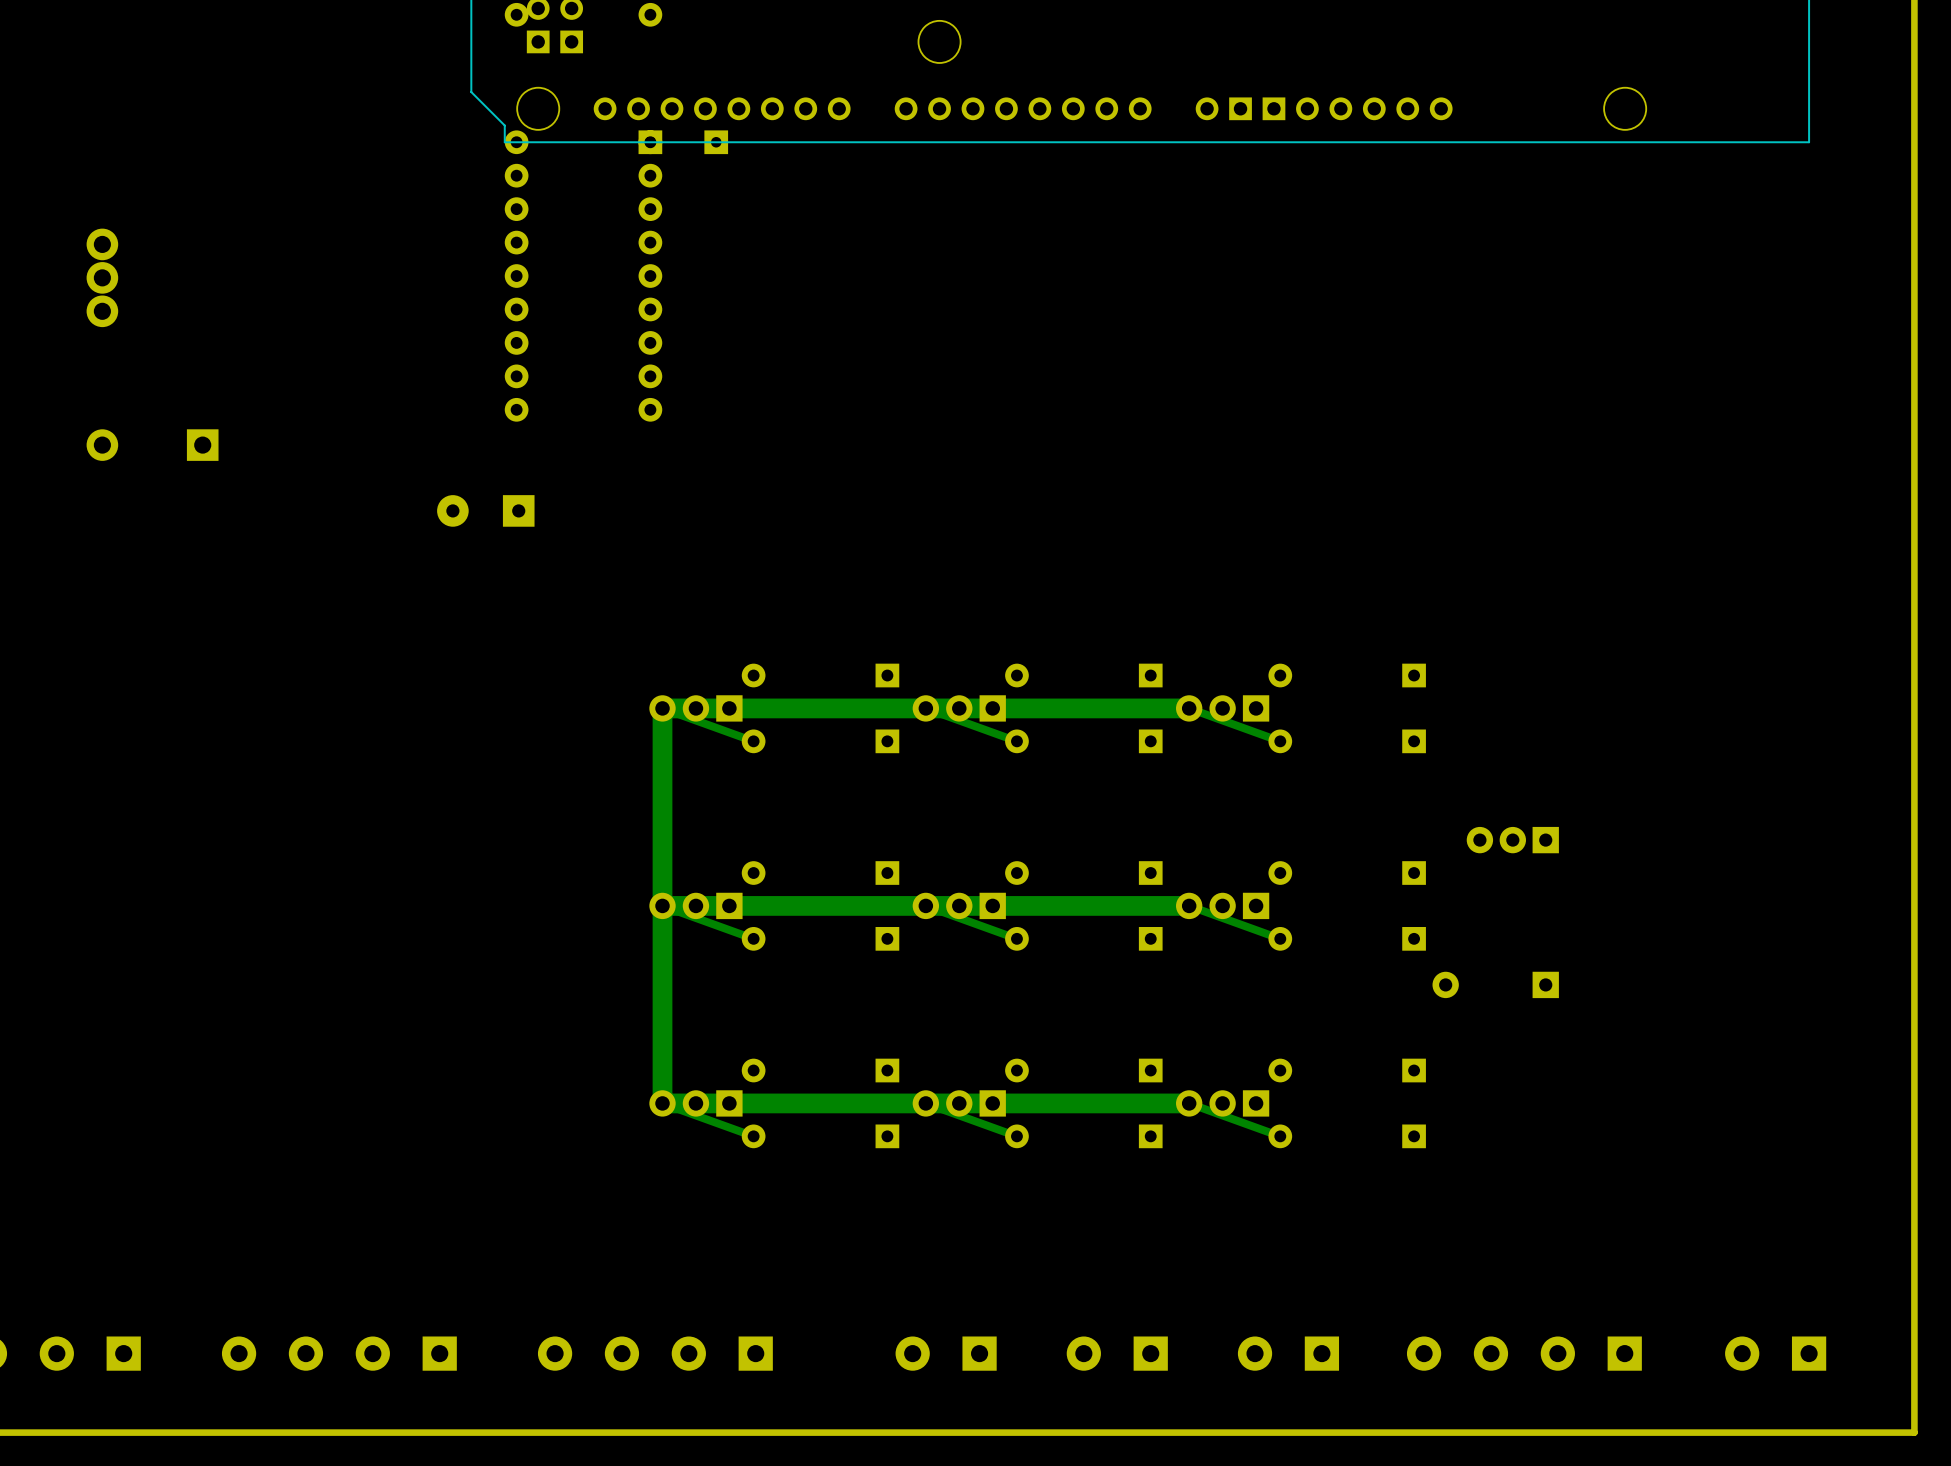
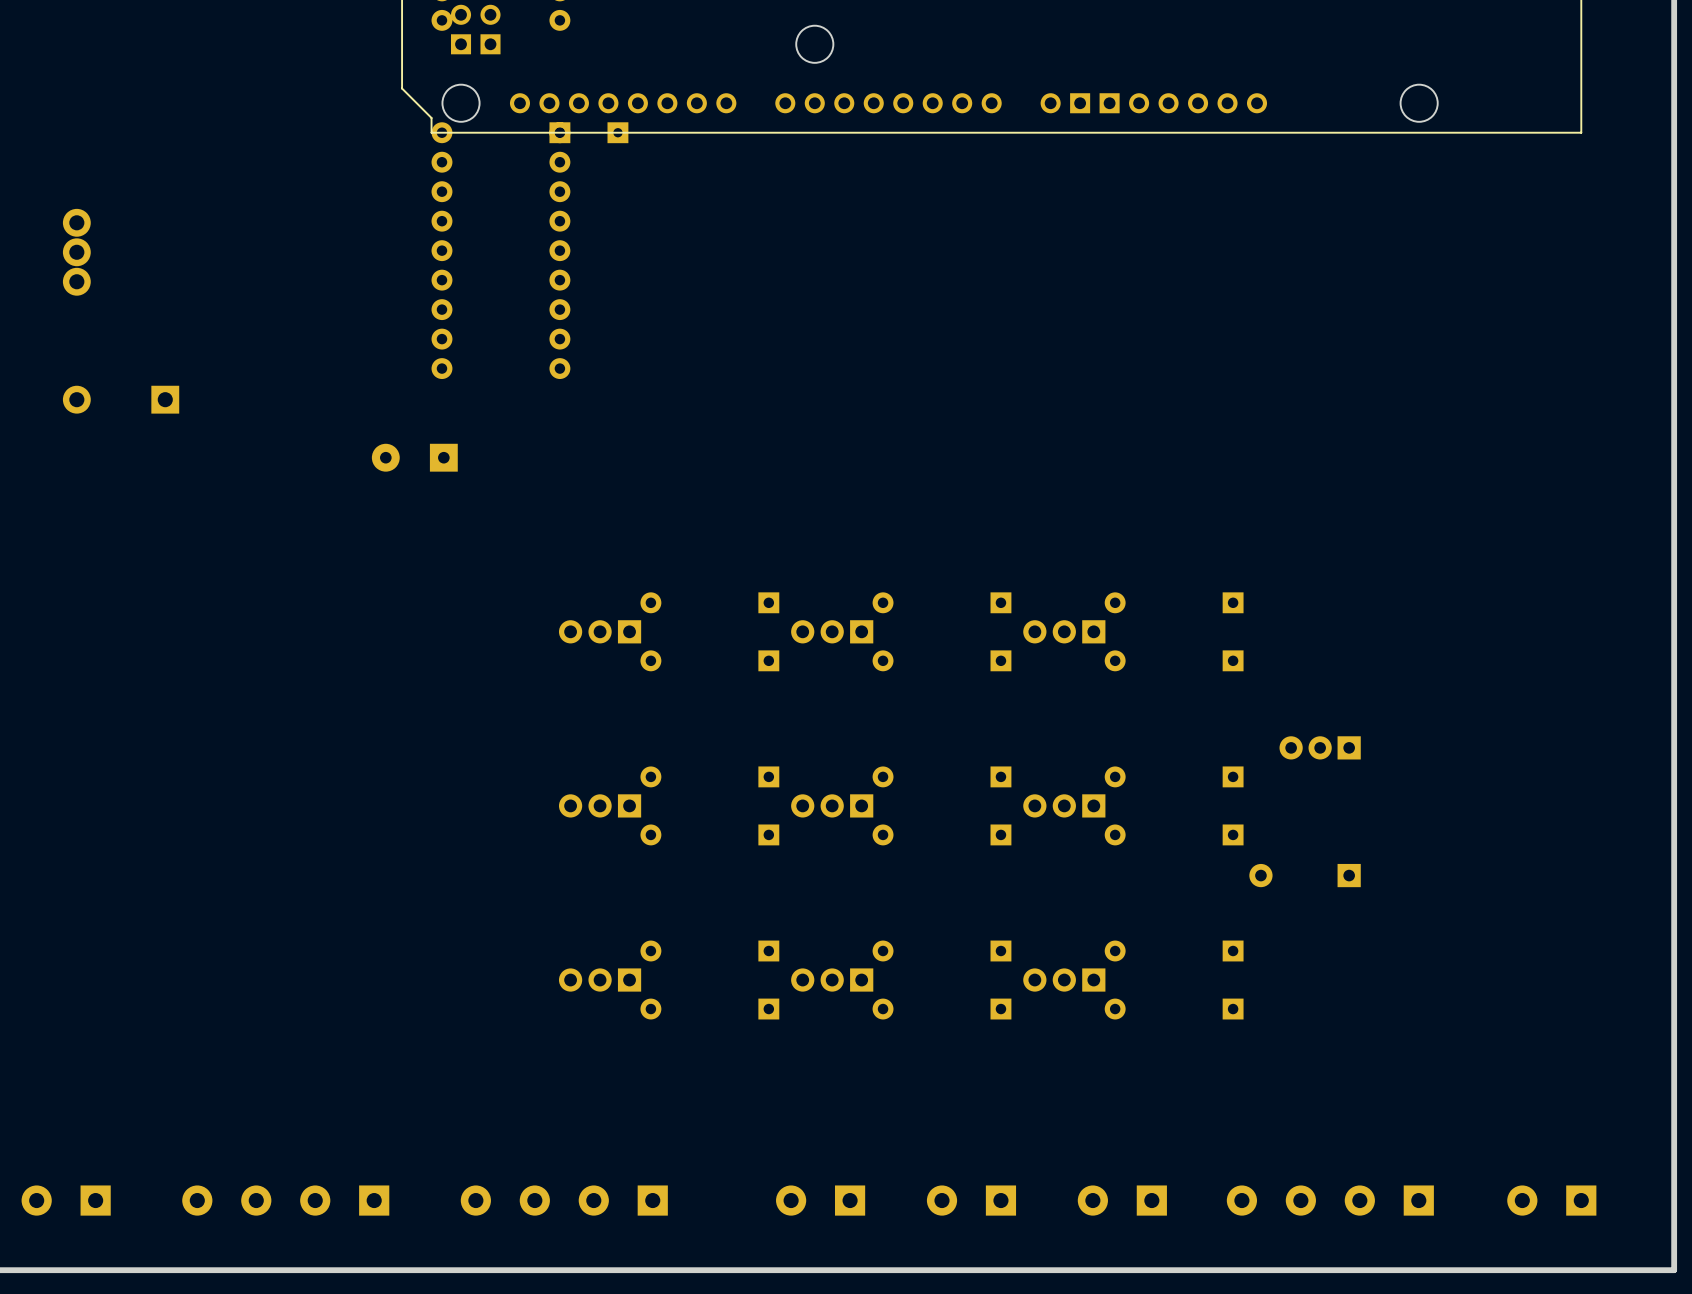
track: (662, 708) (753, 741) -> none
track: (662, 708) (1189, 708) (1280, 741) -> none
track: (662, 708) (662, 1103) -> none
track: (925, 708) (1016, 741) -> none
track: (925, 905) (1016, 938) -> none
track: (1280, 938) (1189, 905) (662, 905) (753, 938) -> none
track: (662, 1103) (753, 1136) -> none
track: (662, 1103) (1189, 1103) (1280, 1136) -> none
track: (925, 1103) (1016, 1136) -> none

